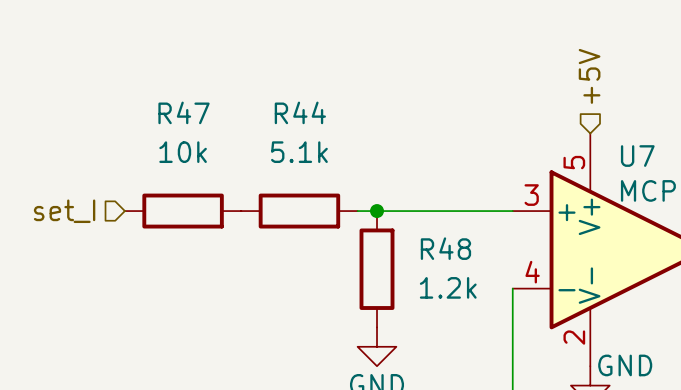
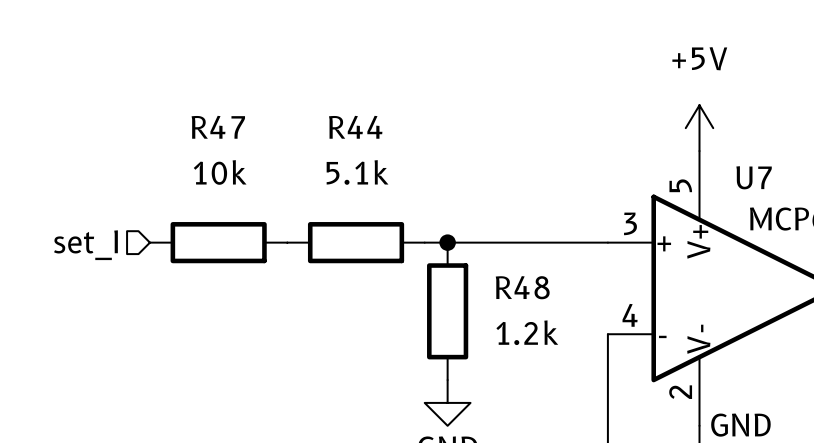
hierarchical label: +5V (589, 76) -> none
power symbol: none -> +5V (699, 128)

